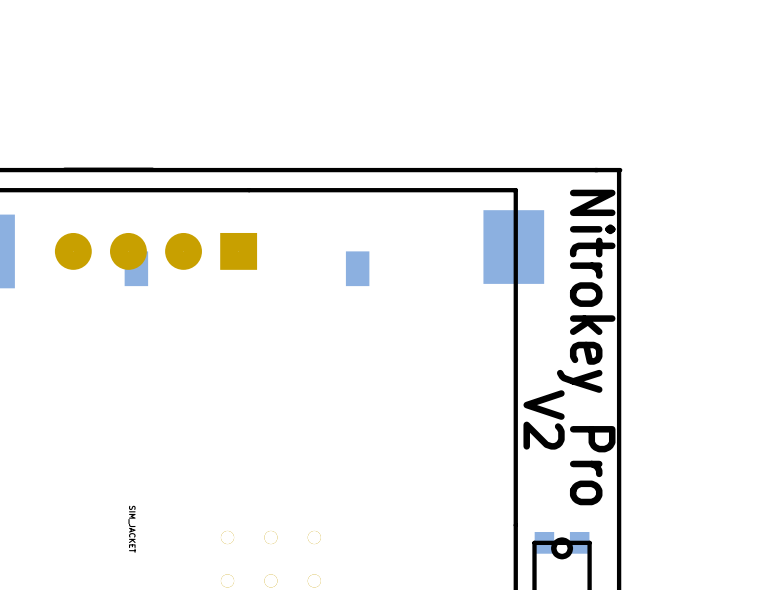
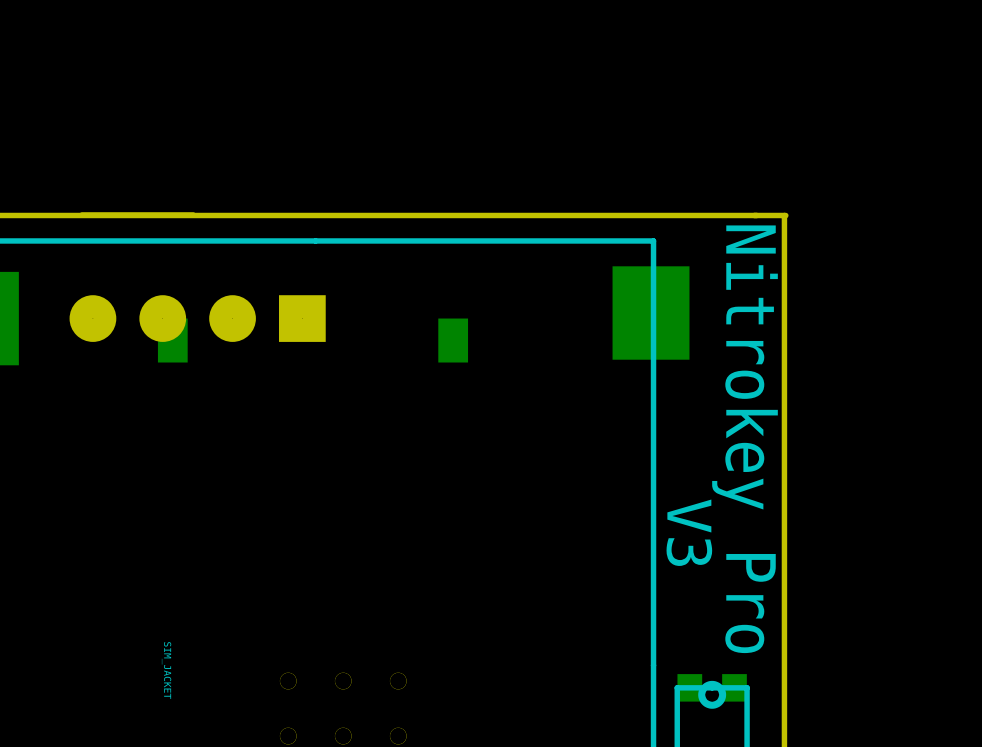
text: V2 (544, 419) -> V3 (689, 532)

